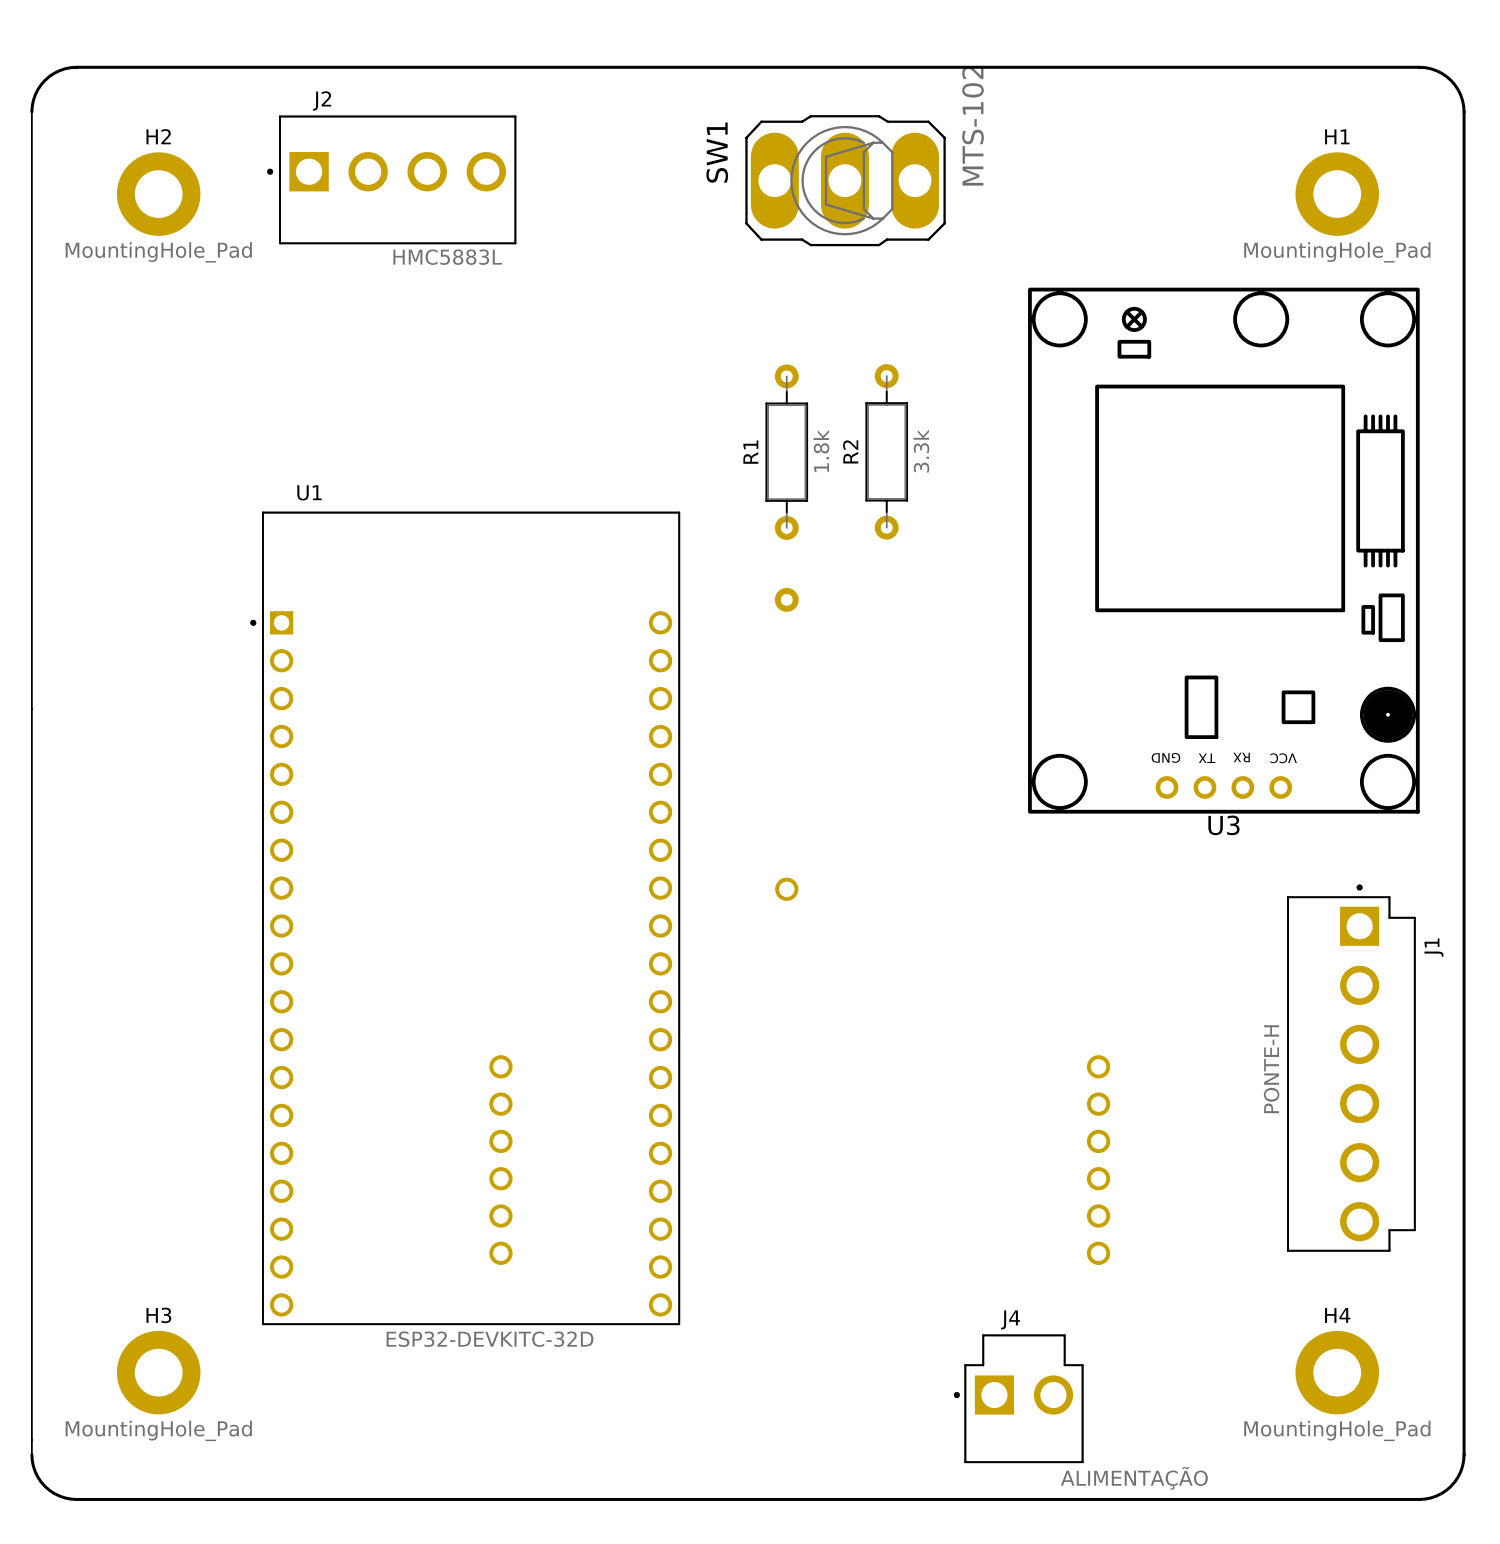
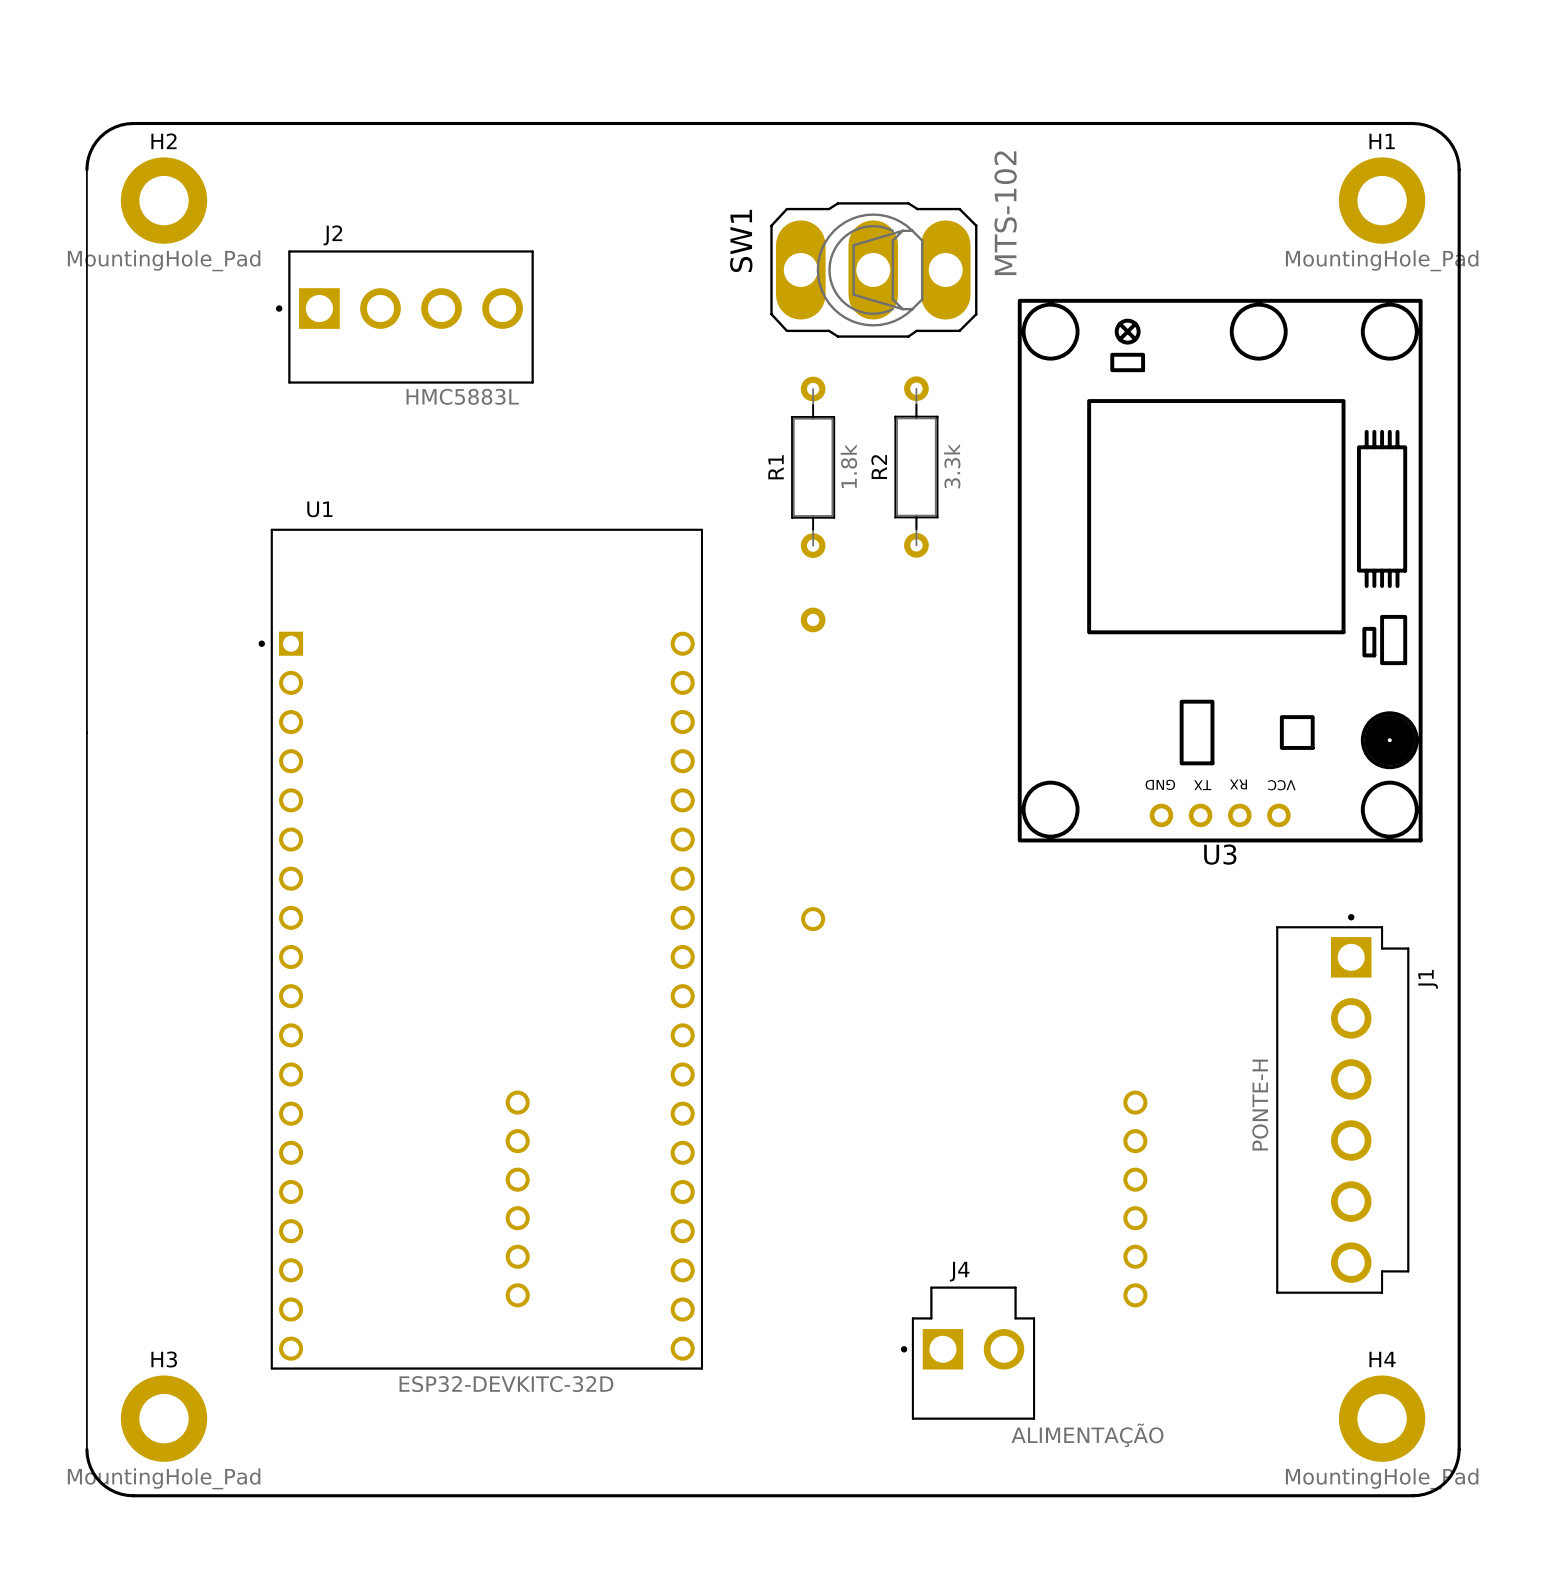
board edge: (76, 67) (1419, 67) (1436, 70) (1450, 80) (1460, 94) (1464, 112) (1464, 1454) (1460, 1471) (1450, 1486) (1436, 1496) (1419, 1499) (76, 1499) (59, 1496) (44, 1486) (35, 1471) (31, 1454) (31, 112) (35, 94) (44, 80) (59, 70) (76, 67) -> (133, 123) (115, 127) (100, 137) (90, 152) (86, 169) (86, 1449) (90, 1467) (100, 1482) (115, 1492) (133, 1495) (1412, 1495) (1430, 1492) (1445, 1482) (1455, 1467) (1459, 1449) (1459, 169) (1455, 152) (1445, 137) (1430, 127) (1412, 123) (133, 123)
J2 position: (391, 179) -> (404, 317)
SW1 position: (845, 180) -> (873, 269)
U3 position: (1223, 550) -> (1220, 570)
J1 position: (1351, 1068) -> (1342, 1103)
J4 position: (1018, 1398) -> (968, 1353)

